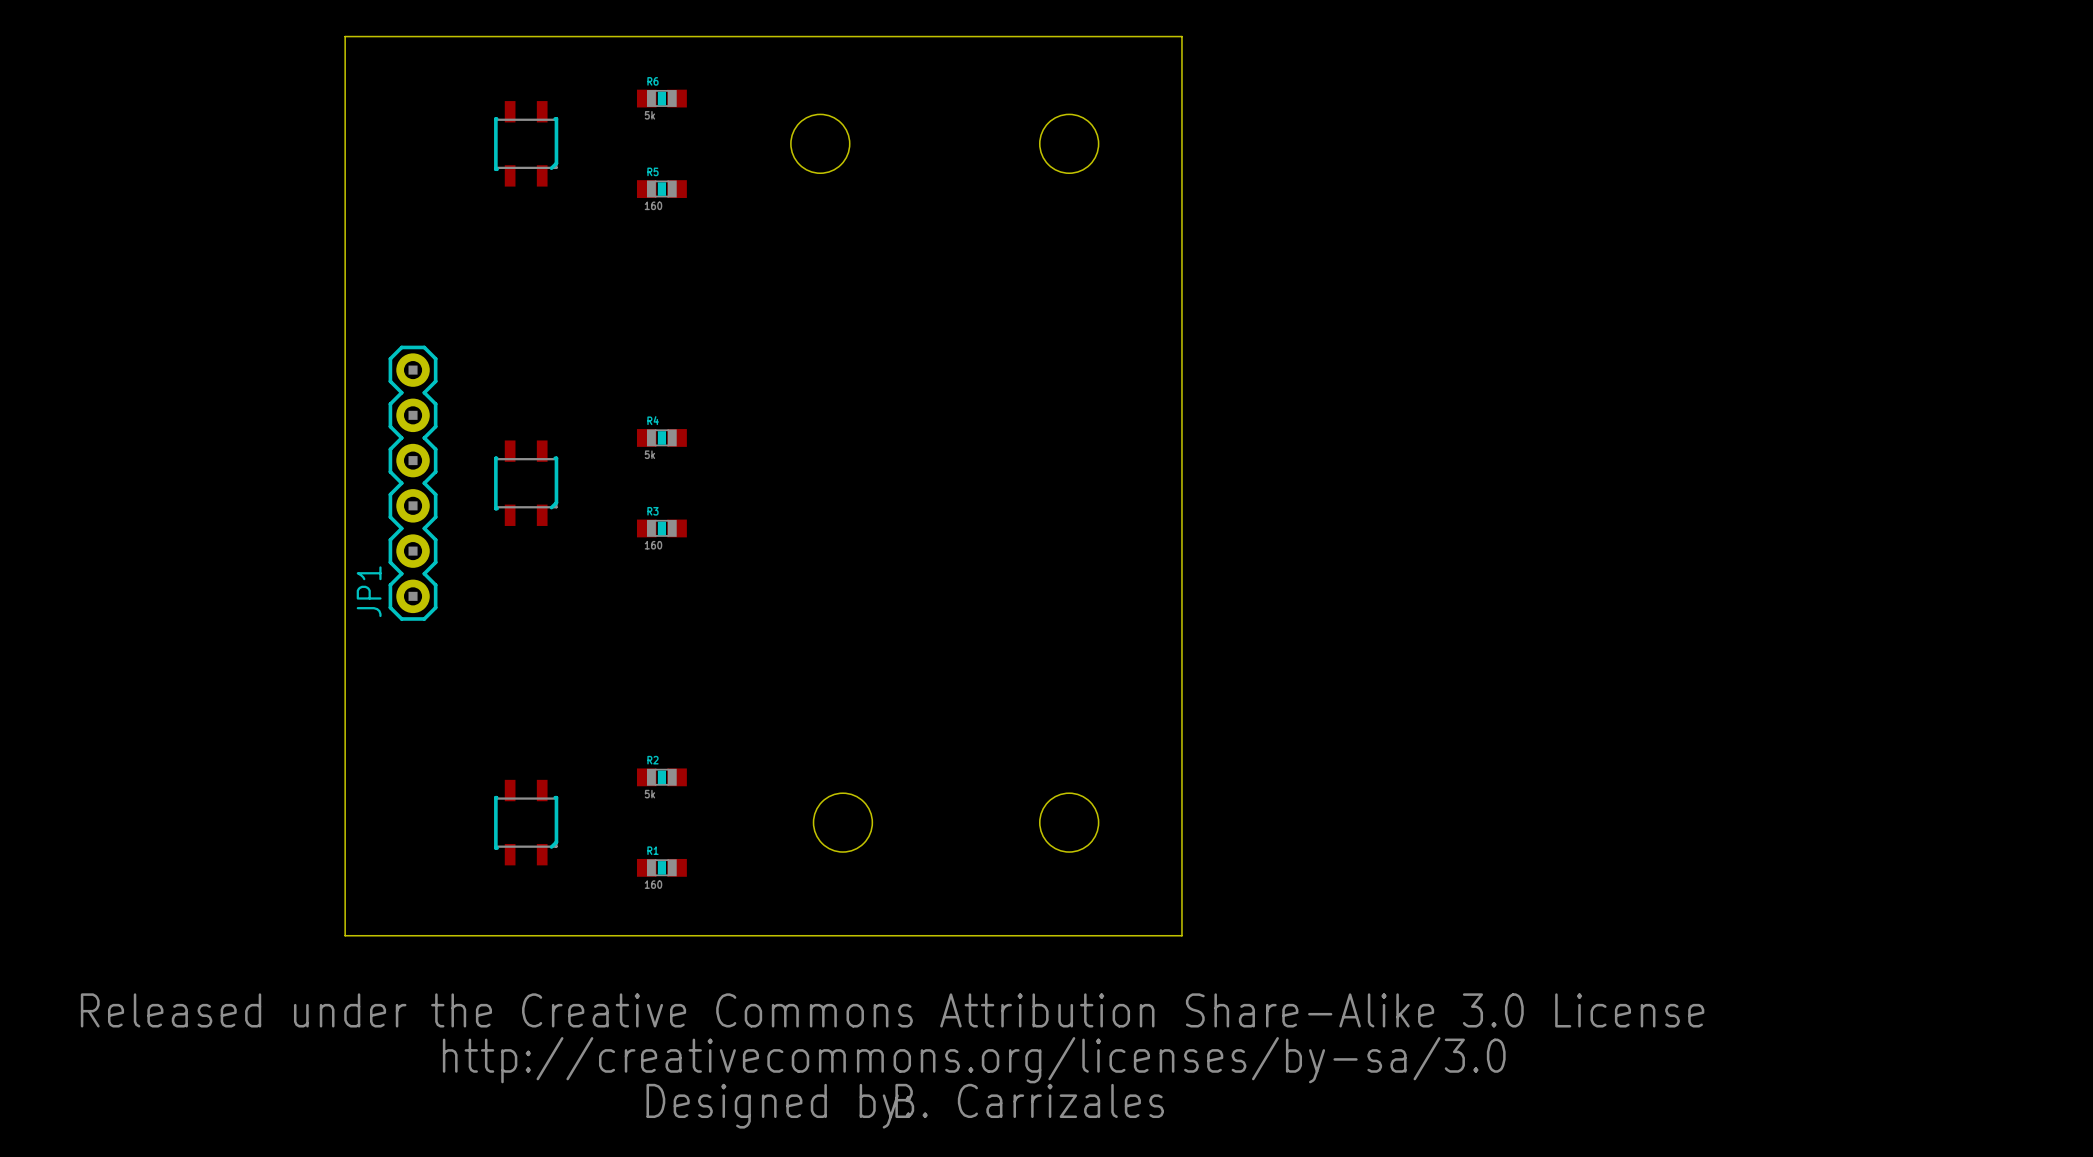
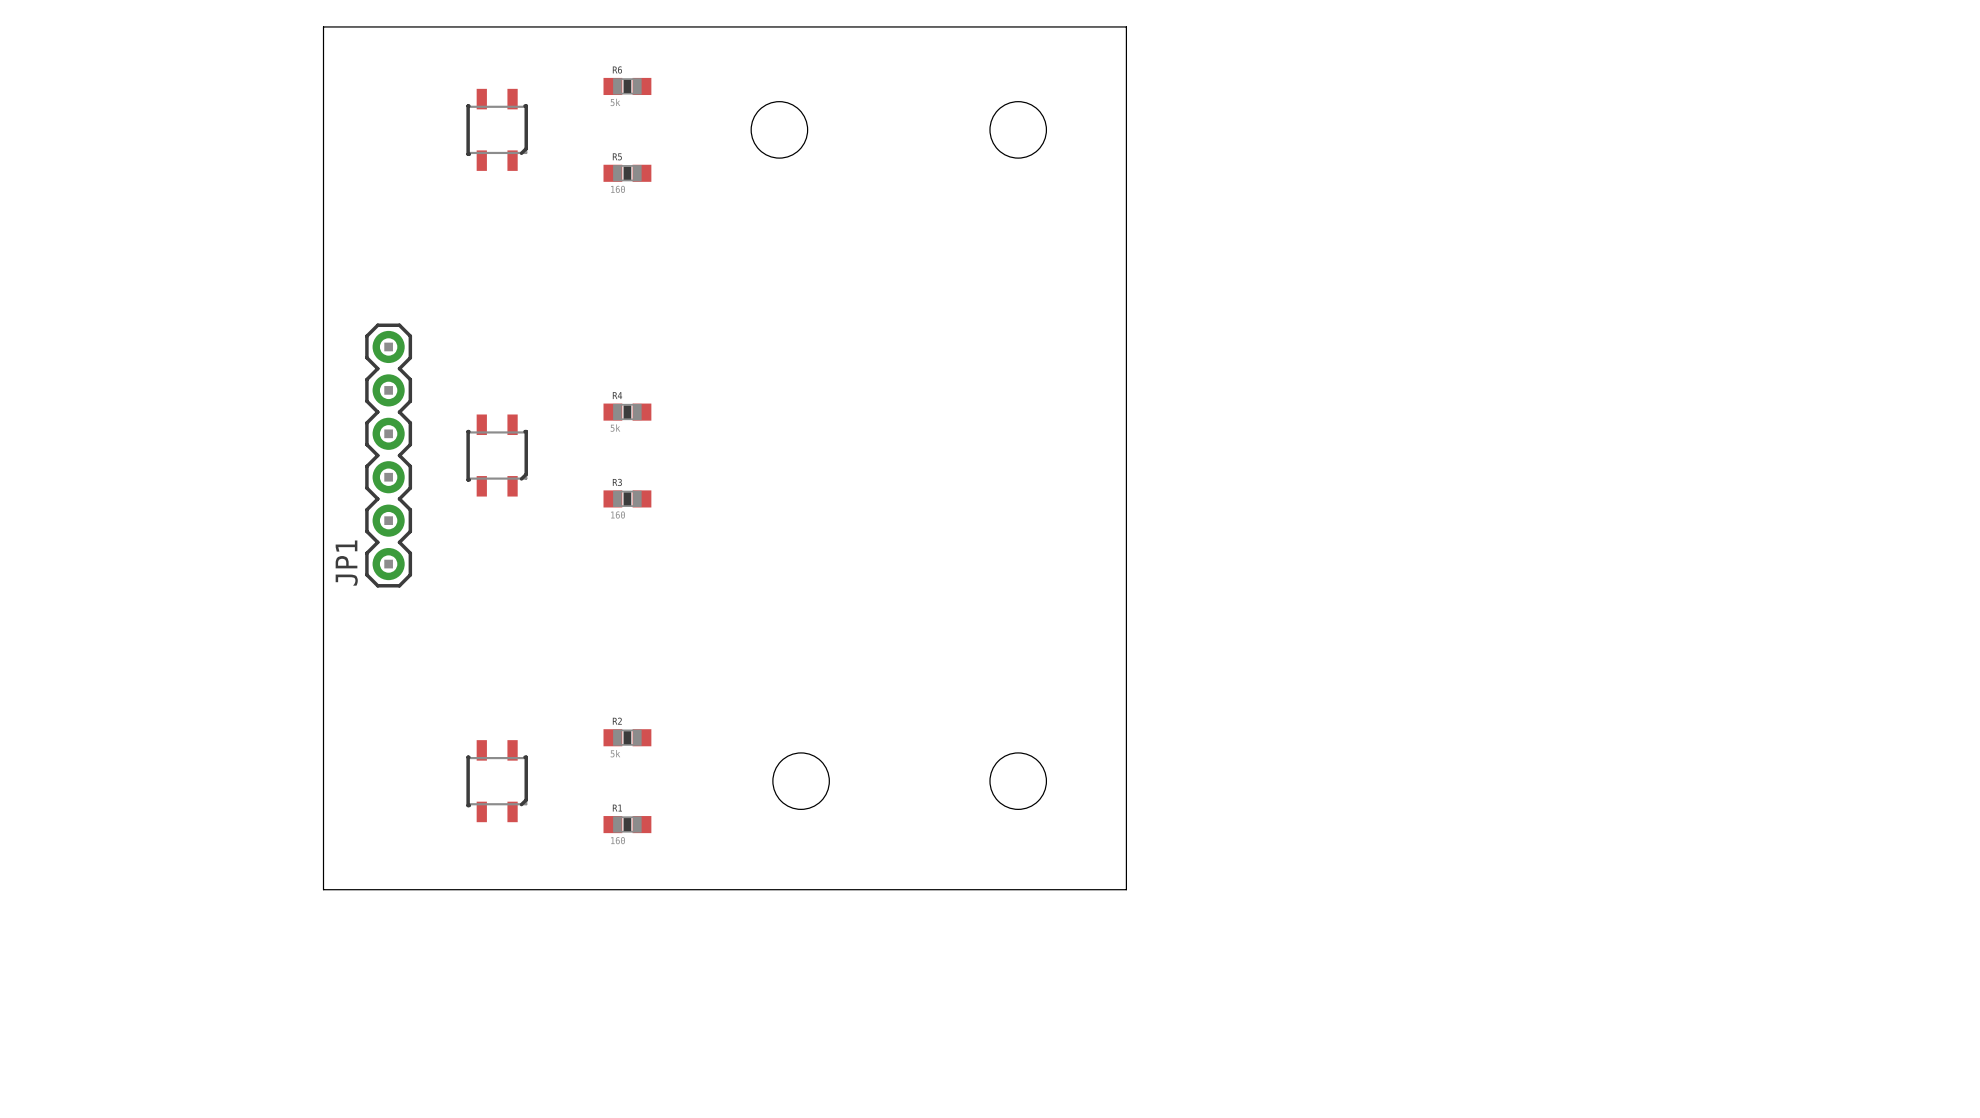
drawing: [80, 993, 1705, 1129] -> none
text: B. Carrizales (1029, 1100) -> none

